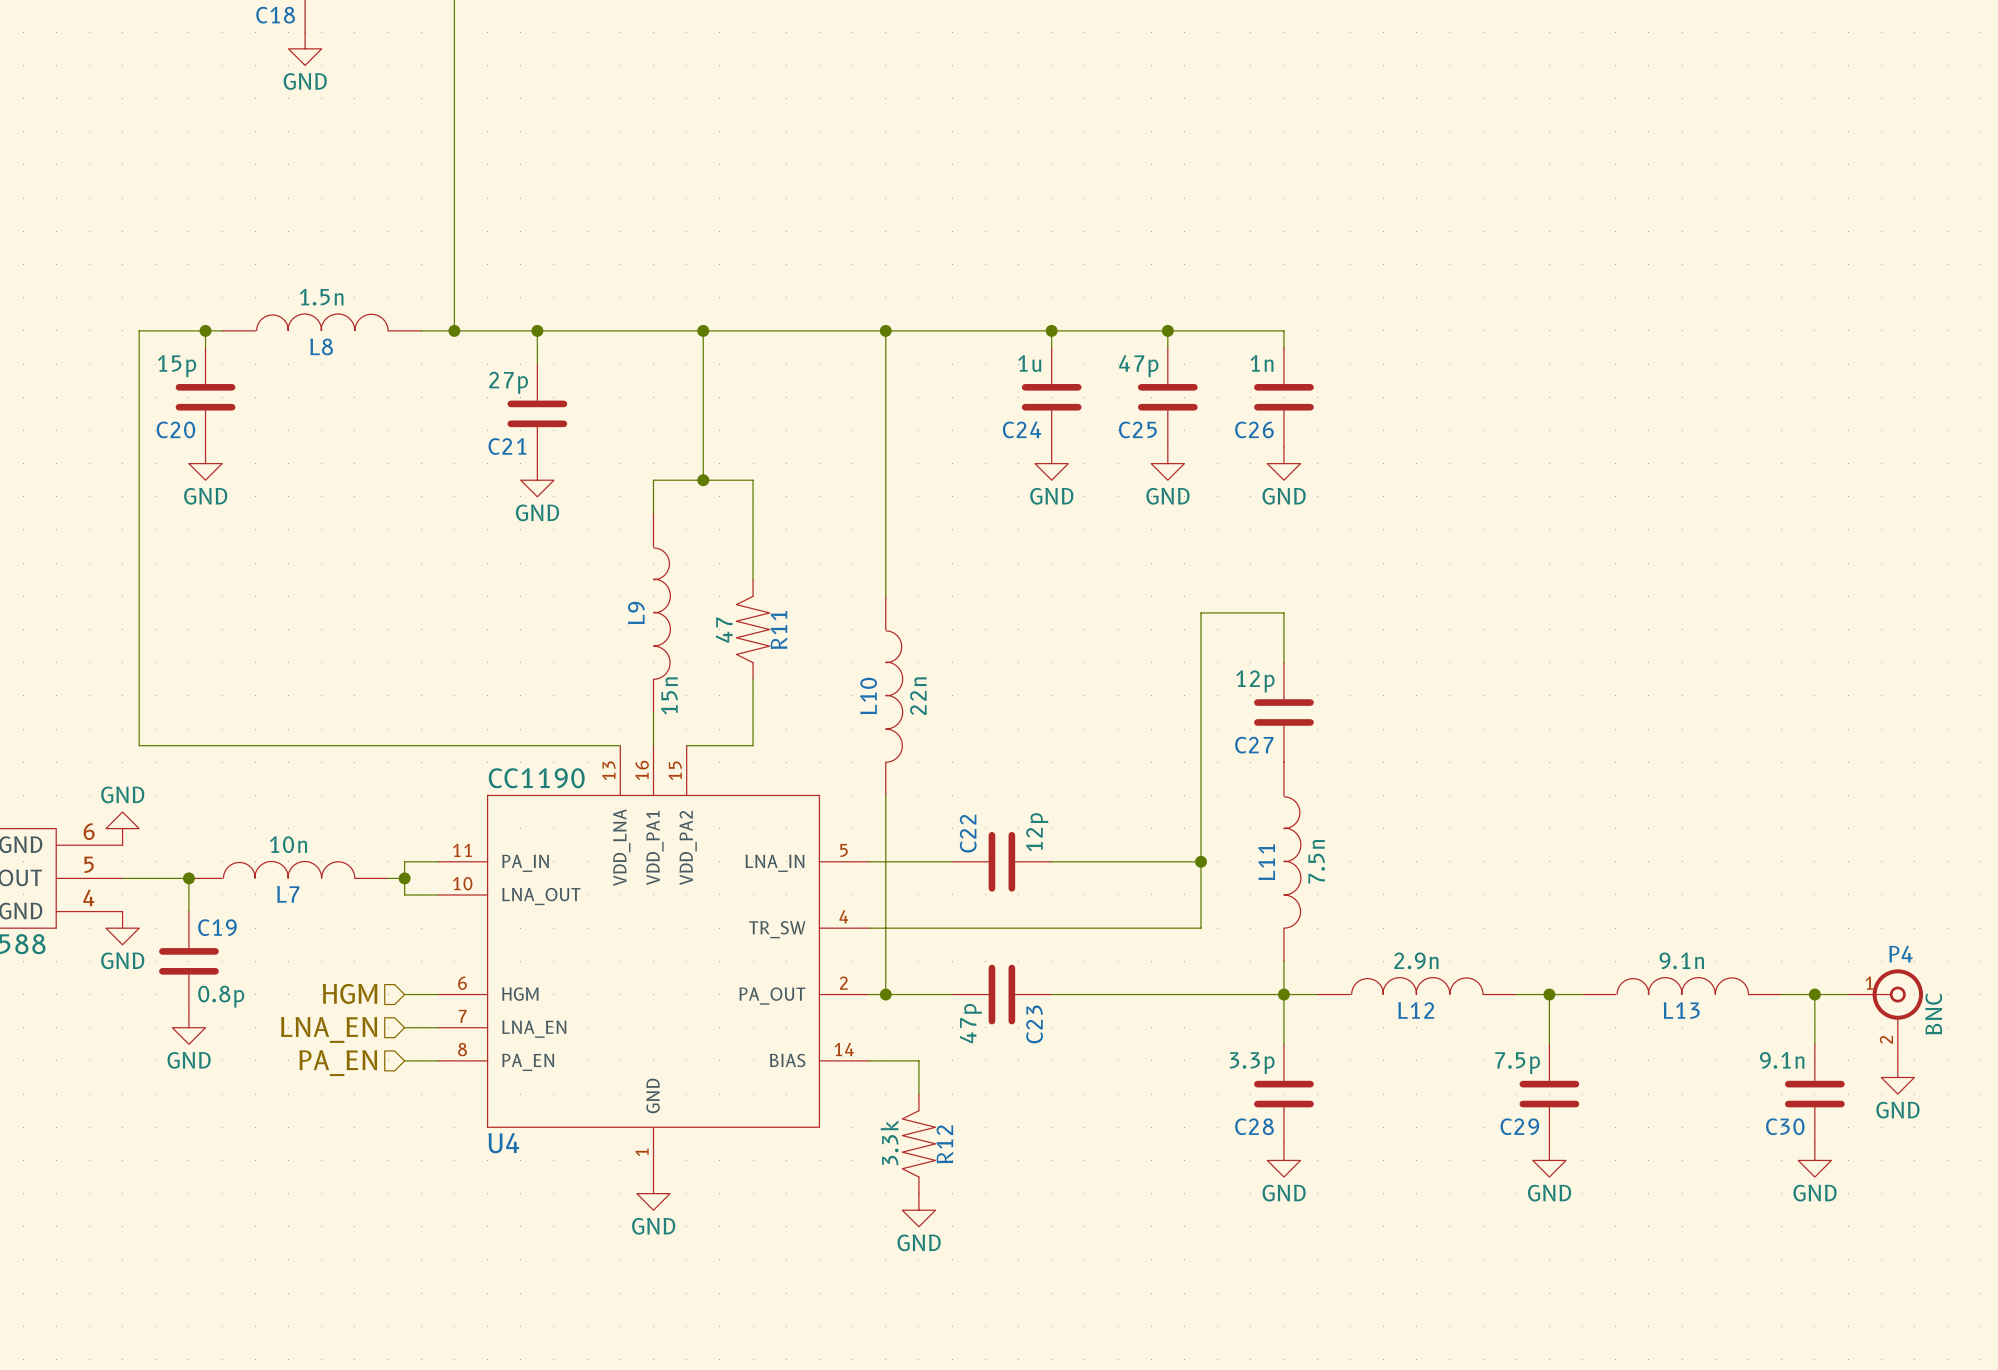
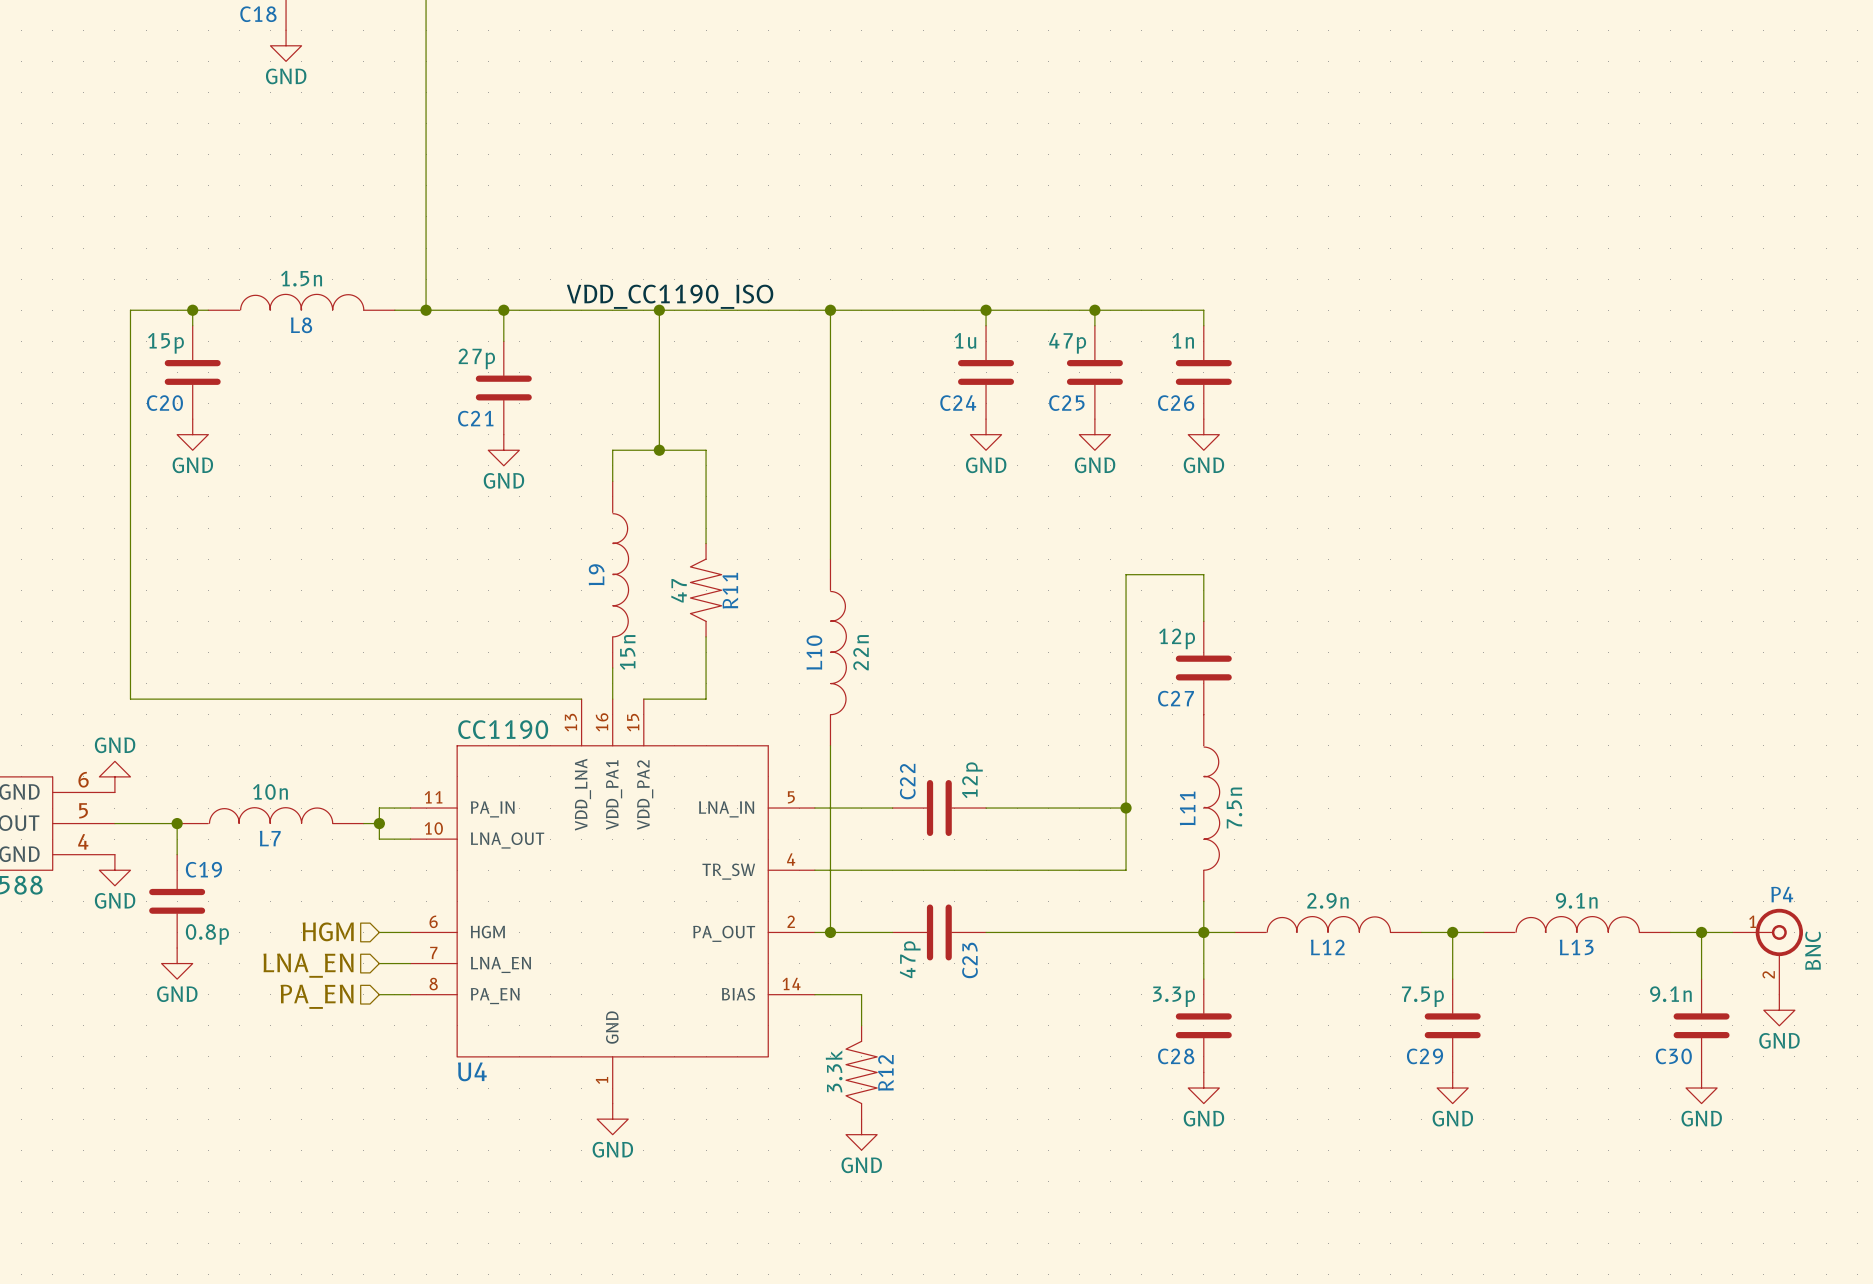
label: none -> VDD_CC1190_ISO (670, 296)

